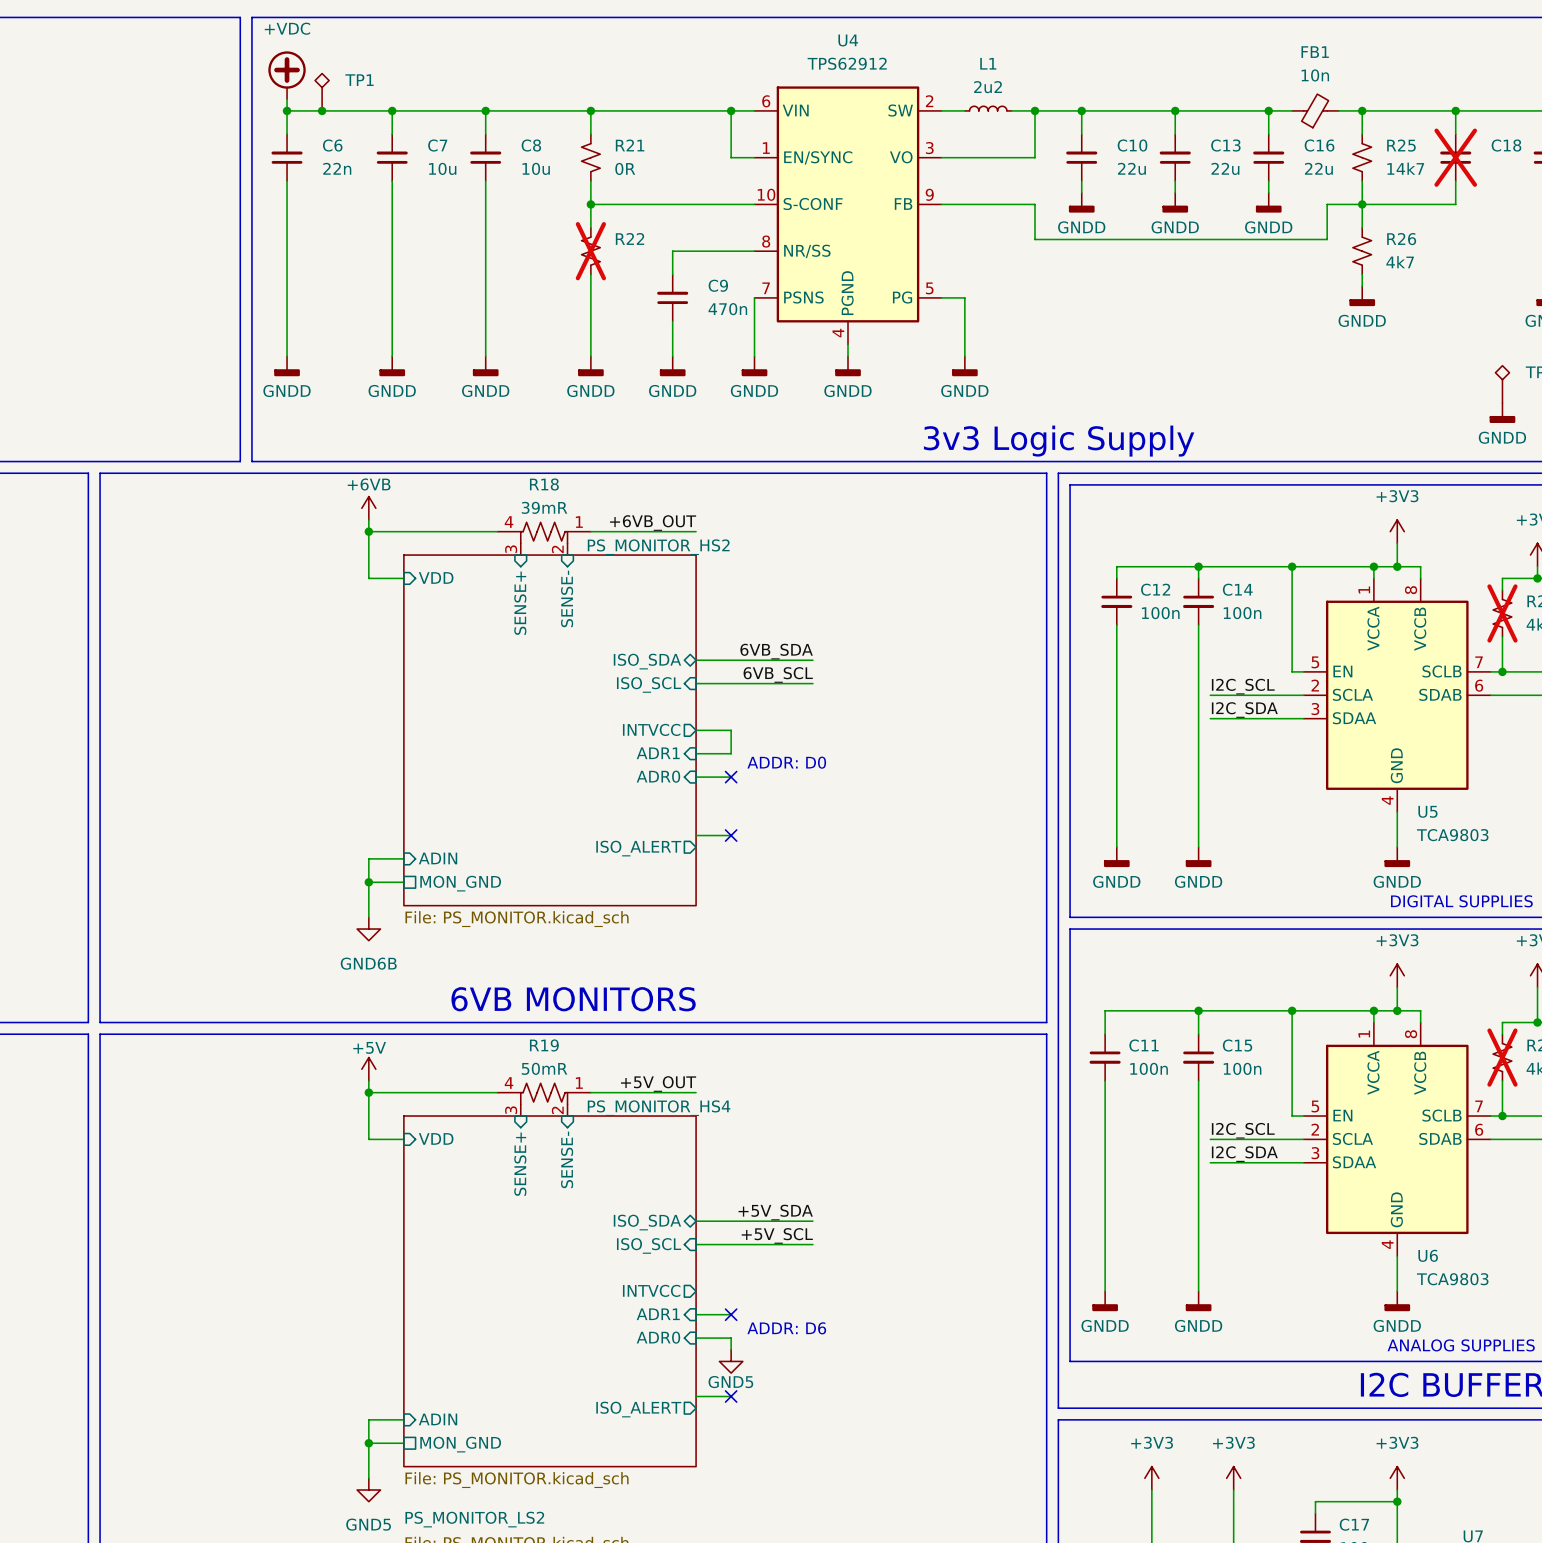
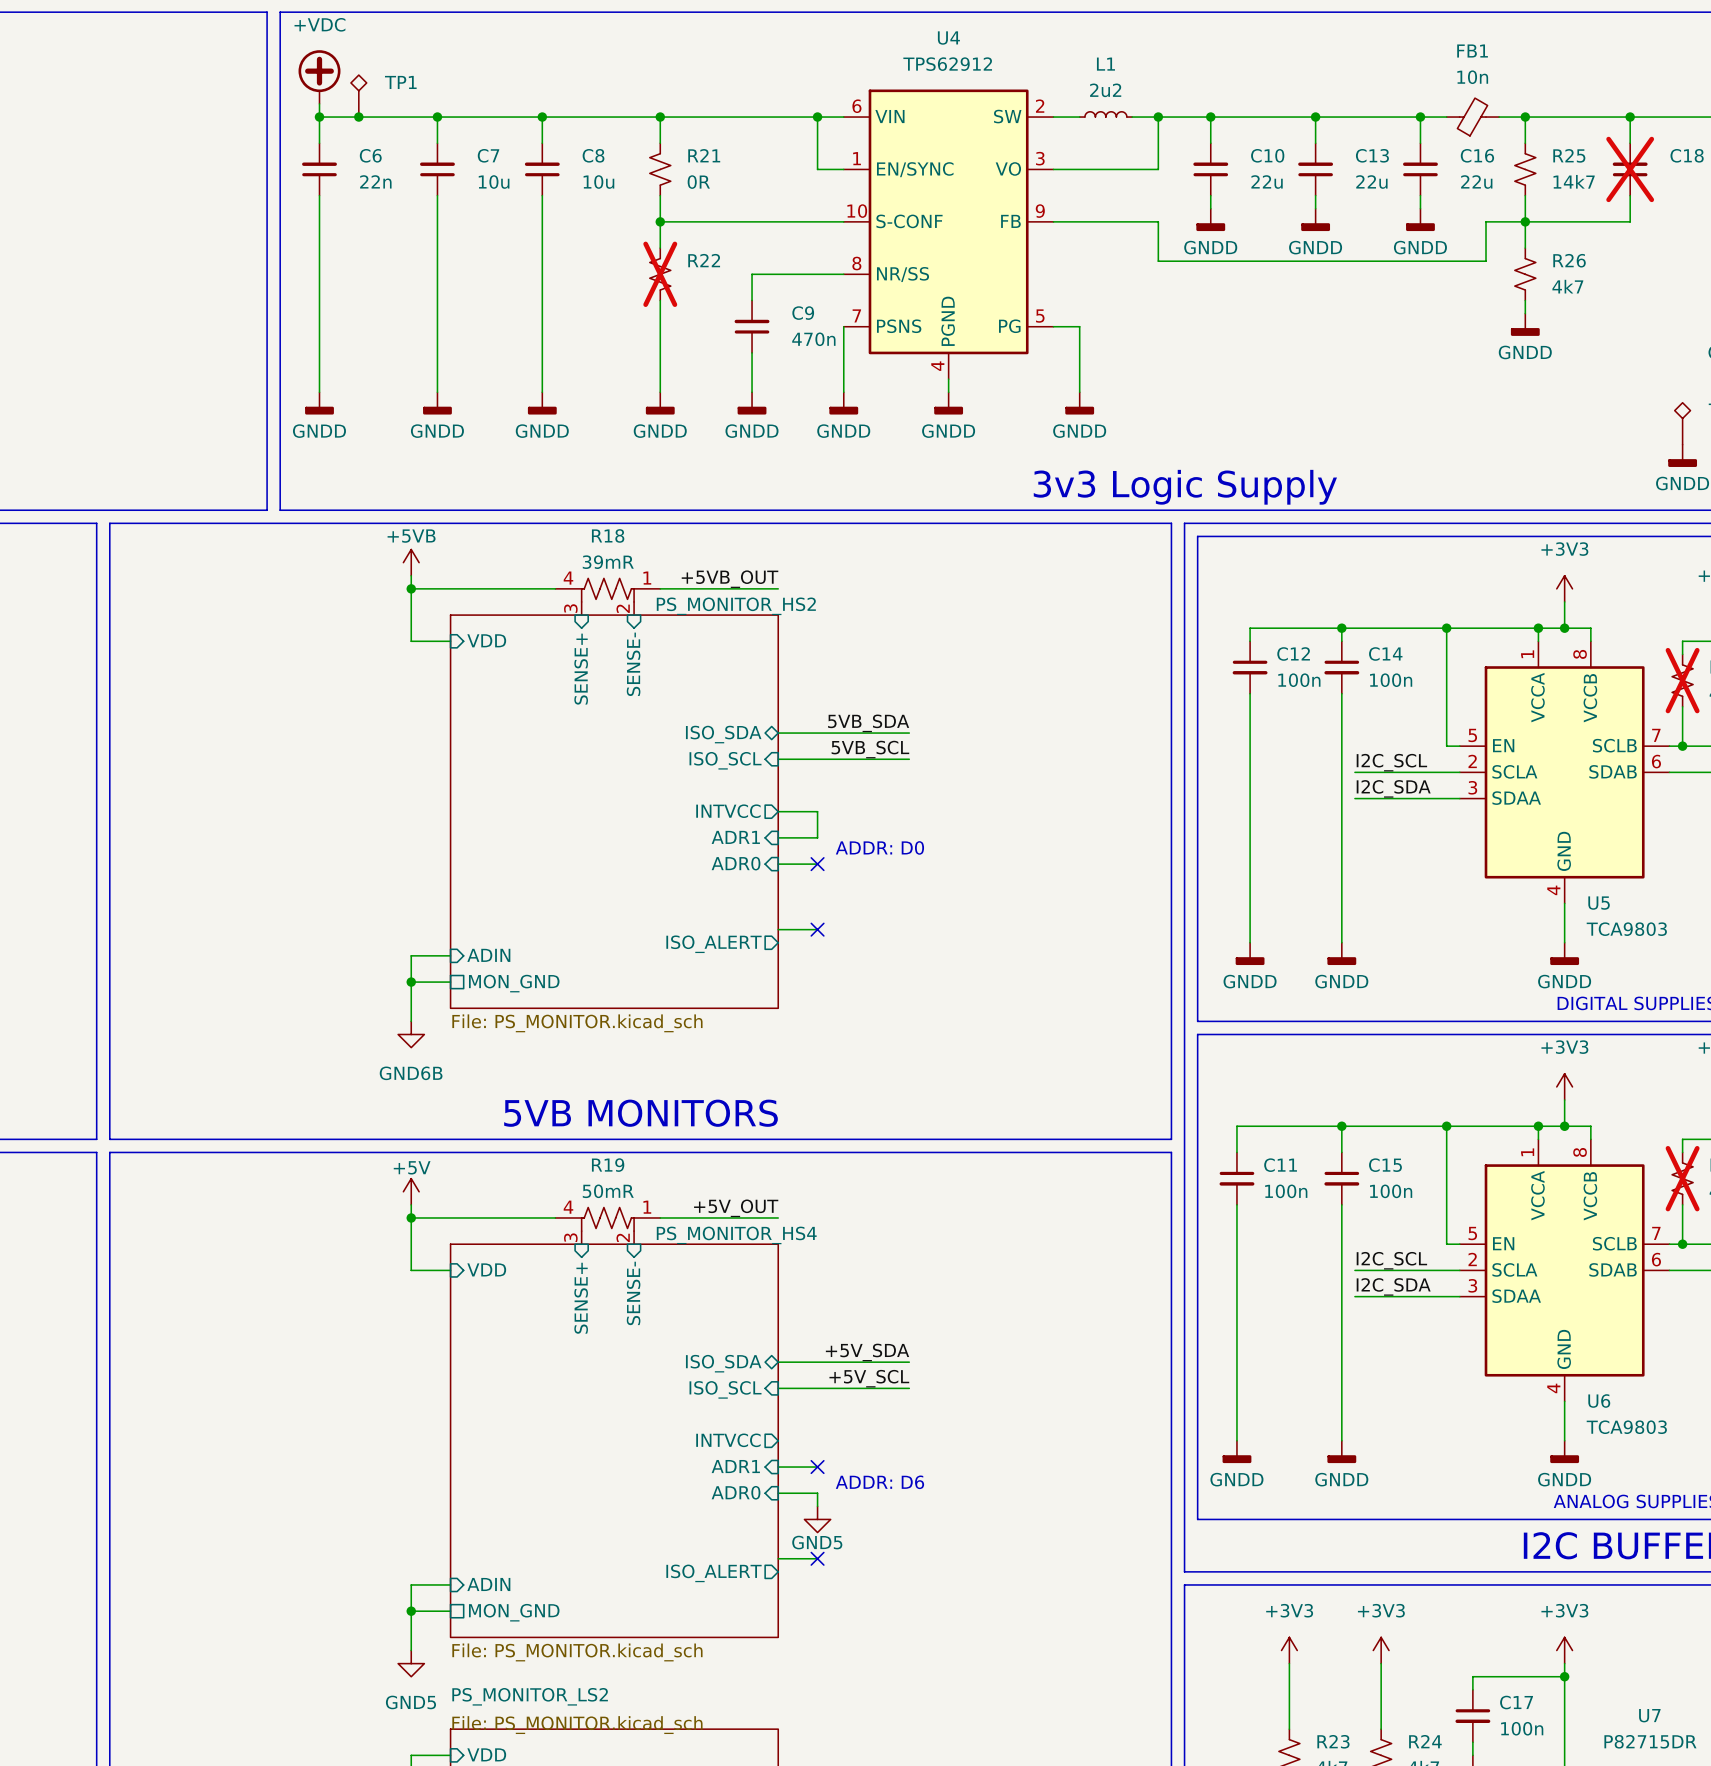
power symbol: +6VB (368, 508) -> +5VB (411, 562)
label: +6VB_OUT (653, 523) -> +5VB_OUT (730, 579)
label: 6VB_SDA (776, 651) -> 5VB_SDA (868, 723)
label: 6VB_SCL (778, 674) -> 5VB_SCL (870, 749)
text: 6VB MONITORS (573, 999) -> 5VB MONITORS (641, 1113)

